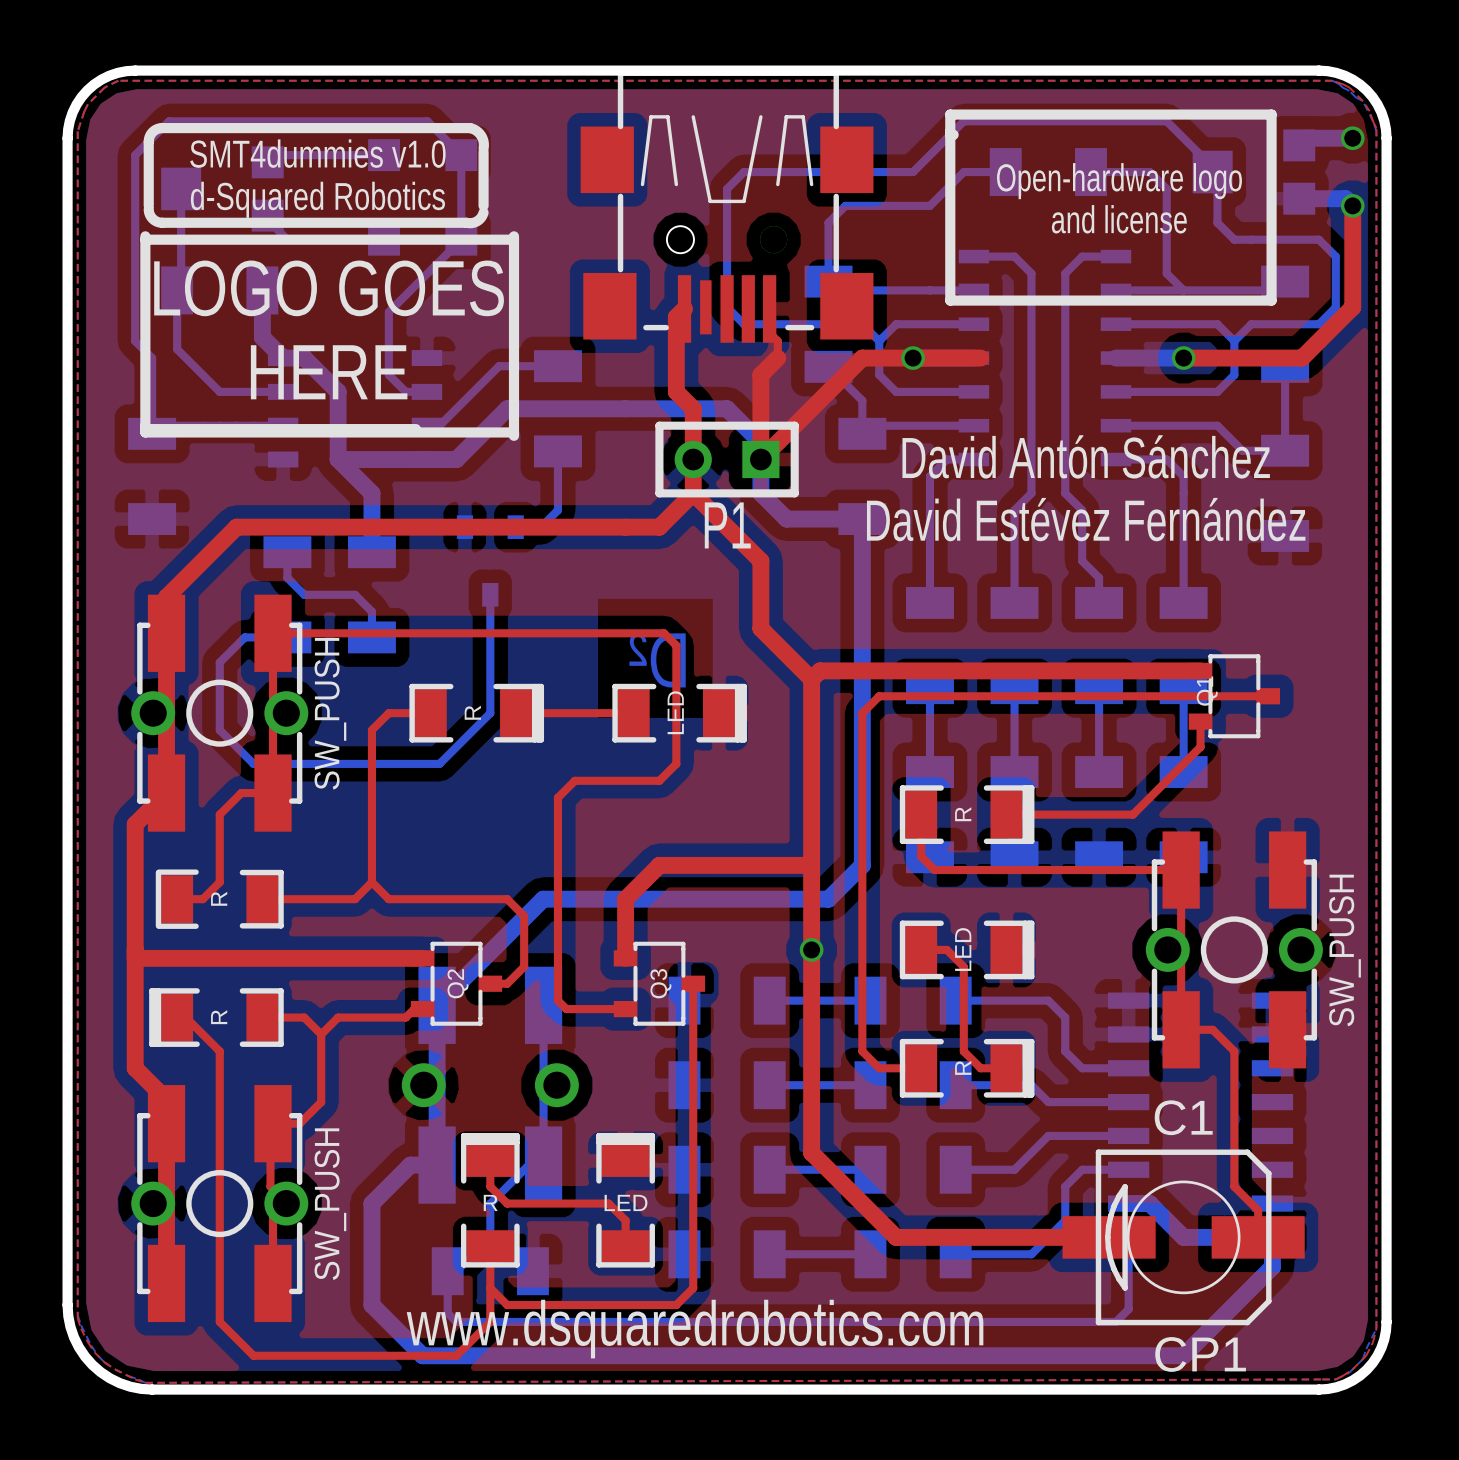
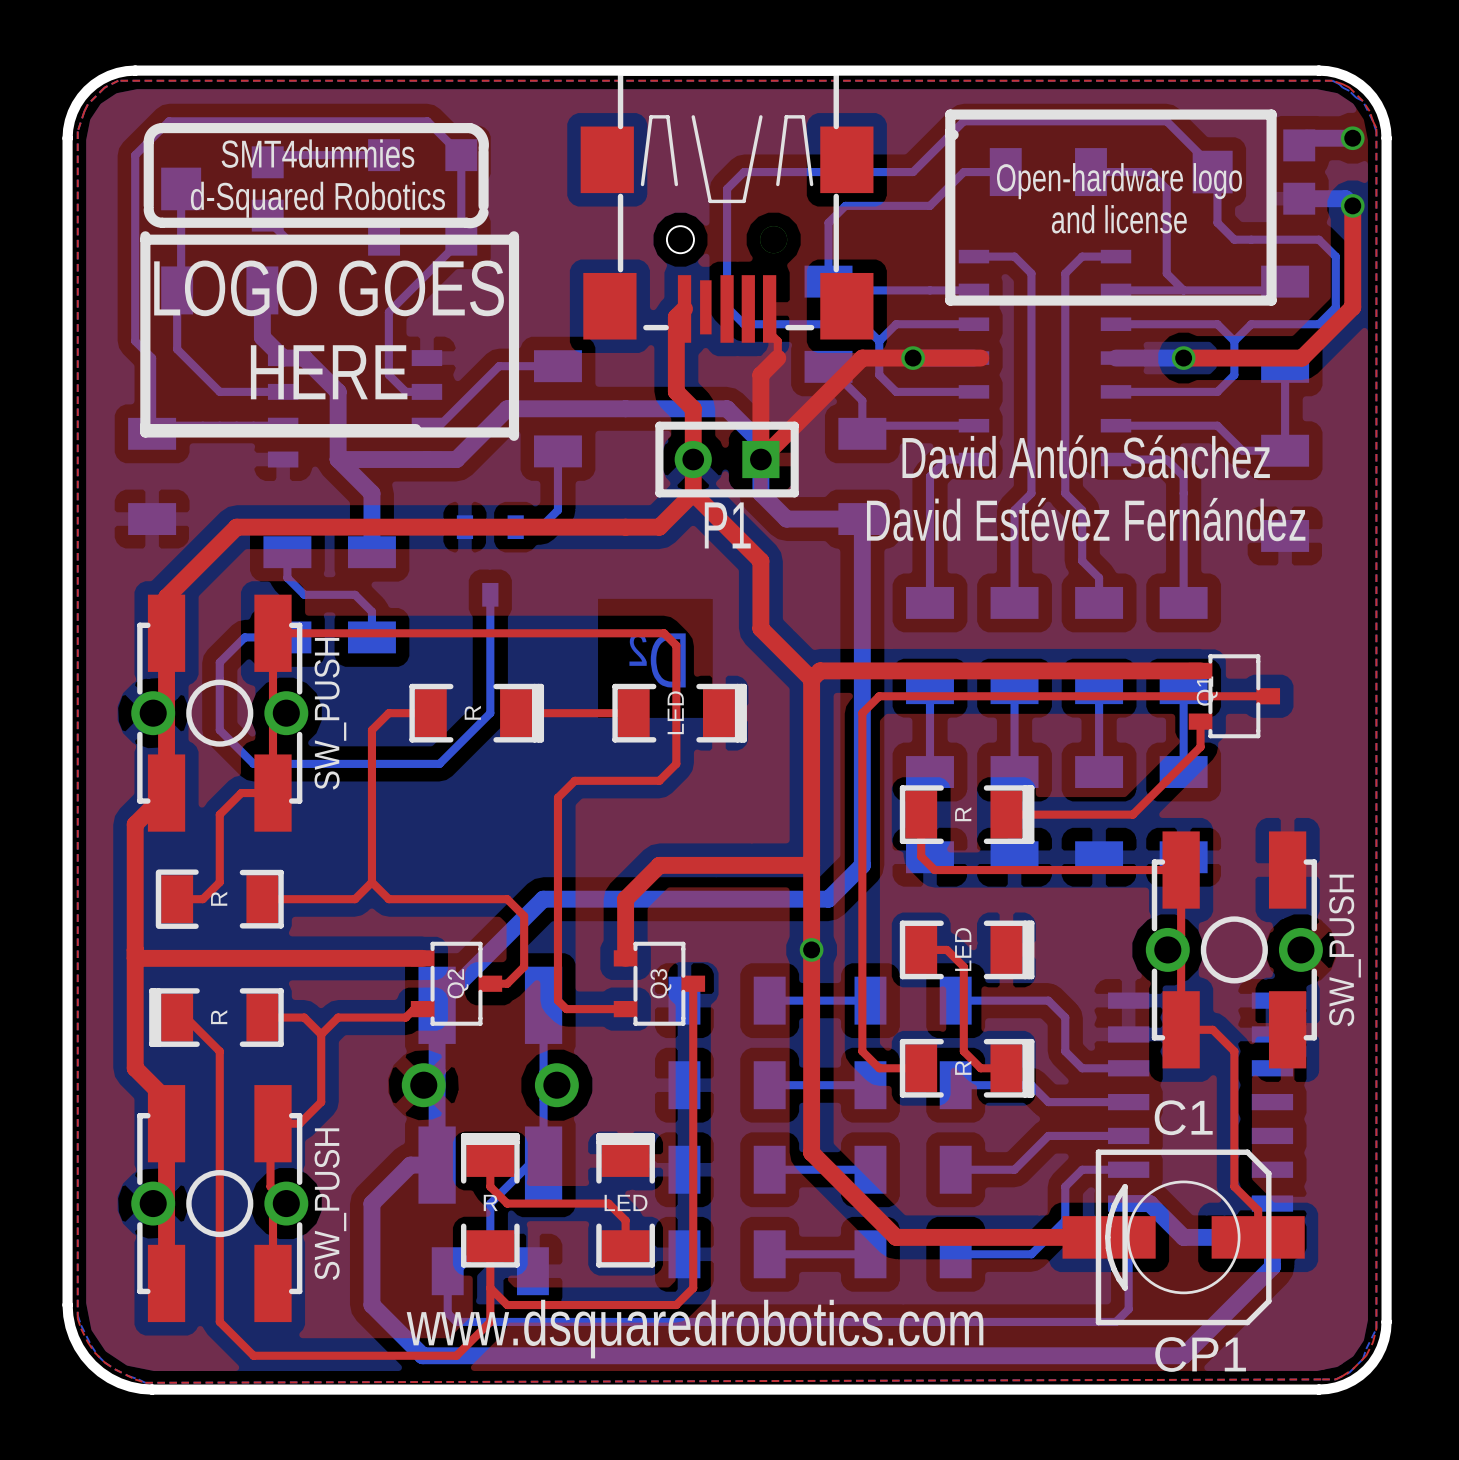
text: SMT4dummies v1.0 (317, 153) -> SMT4dummies (317, 153)

